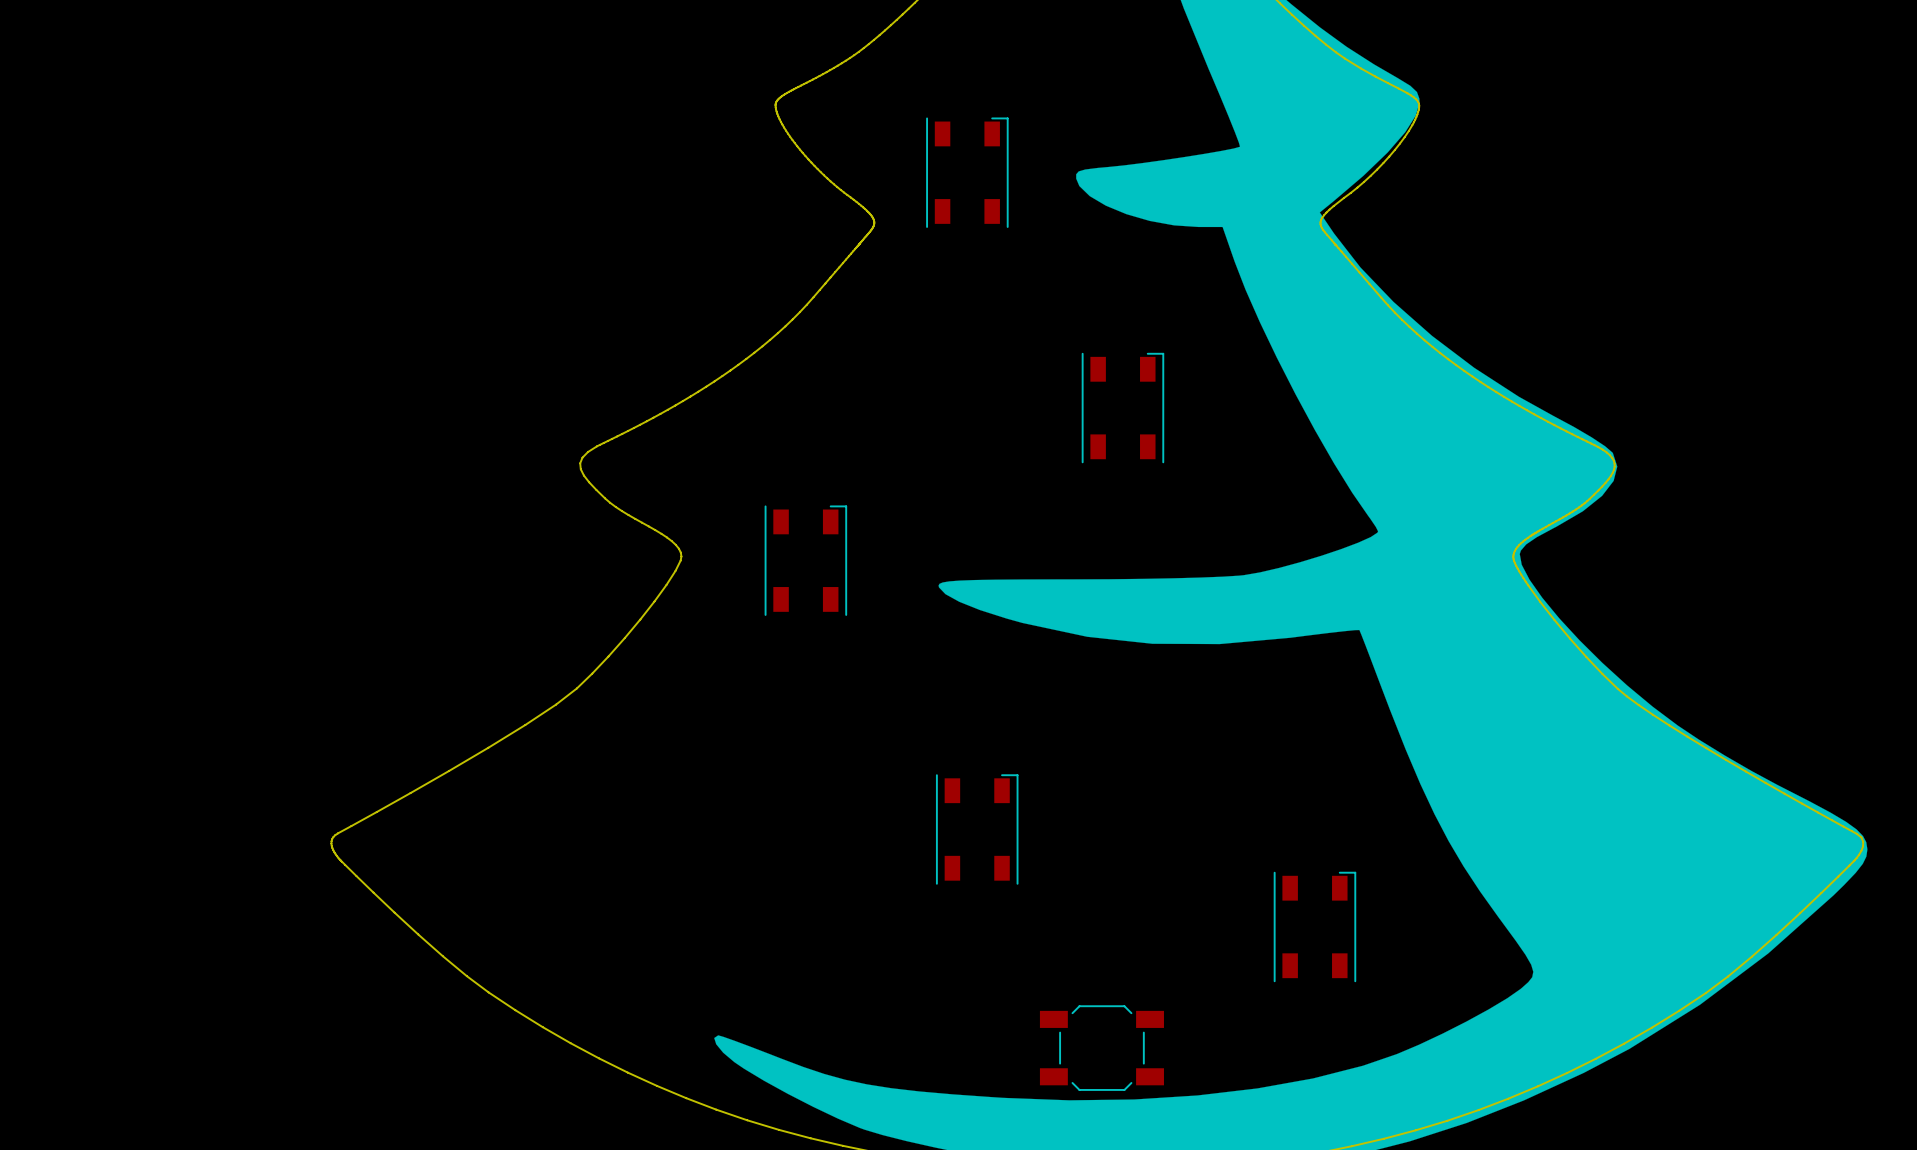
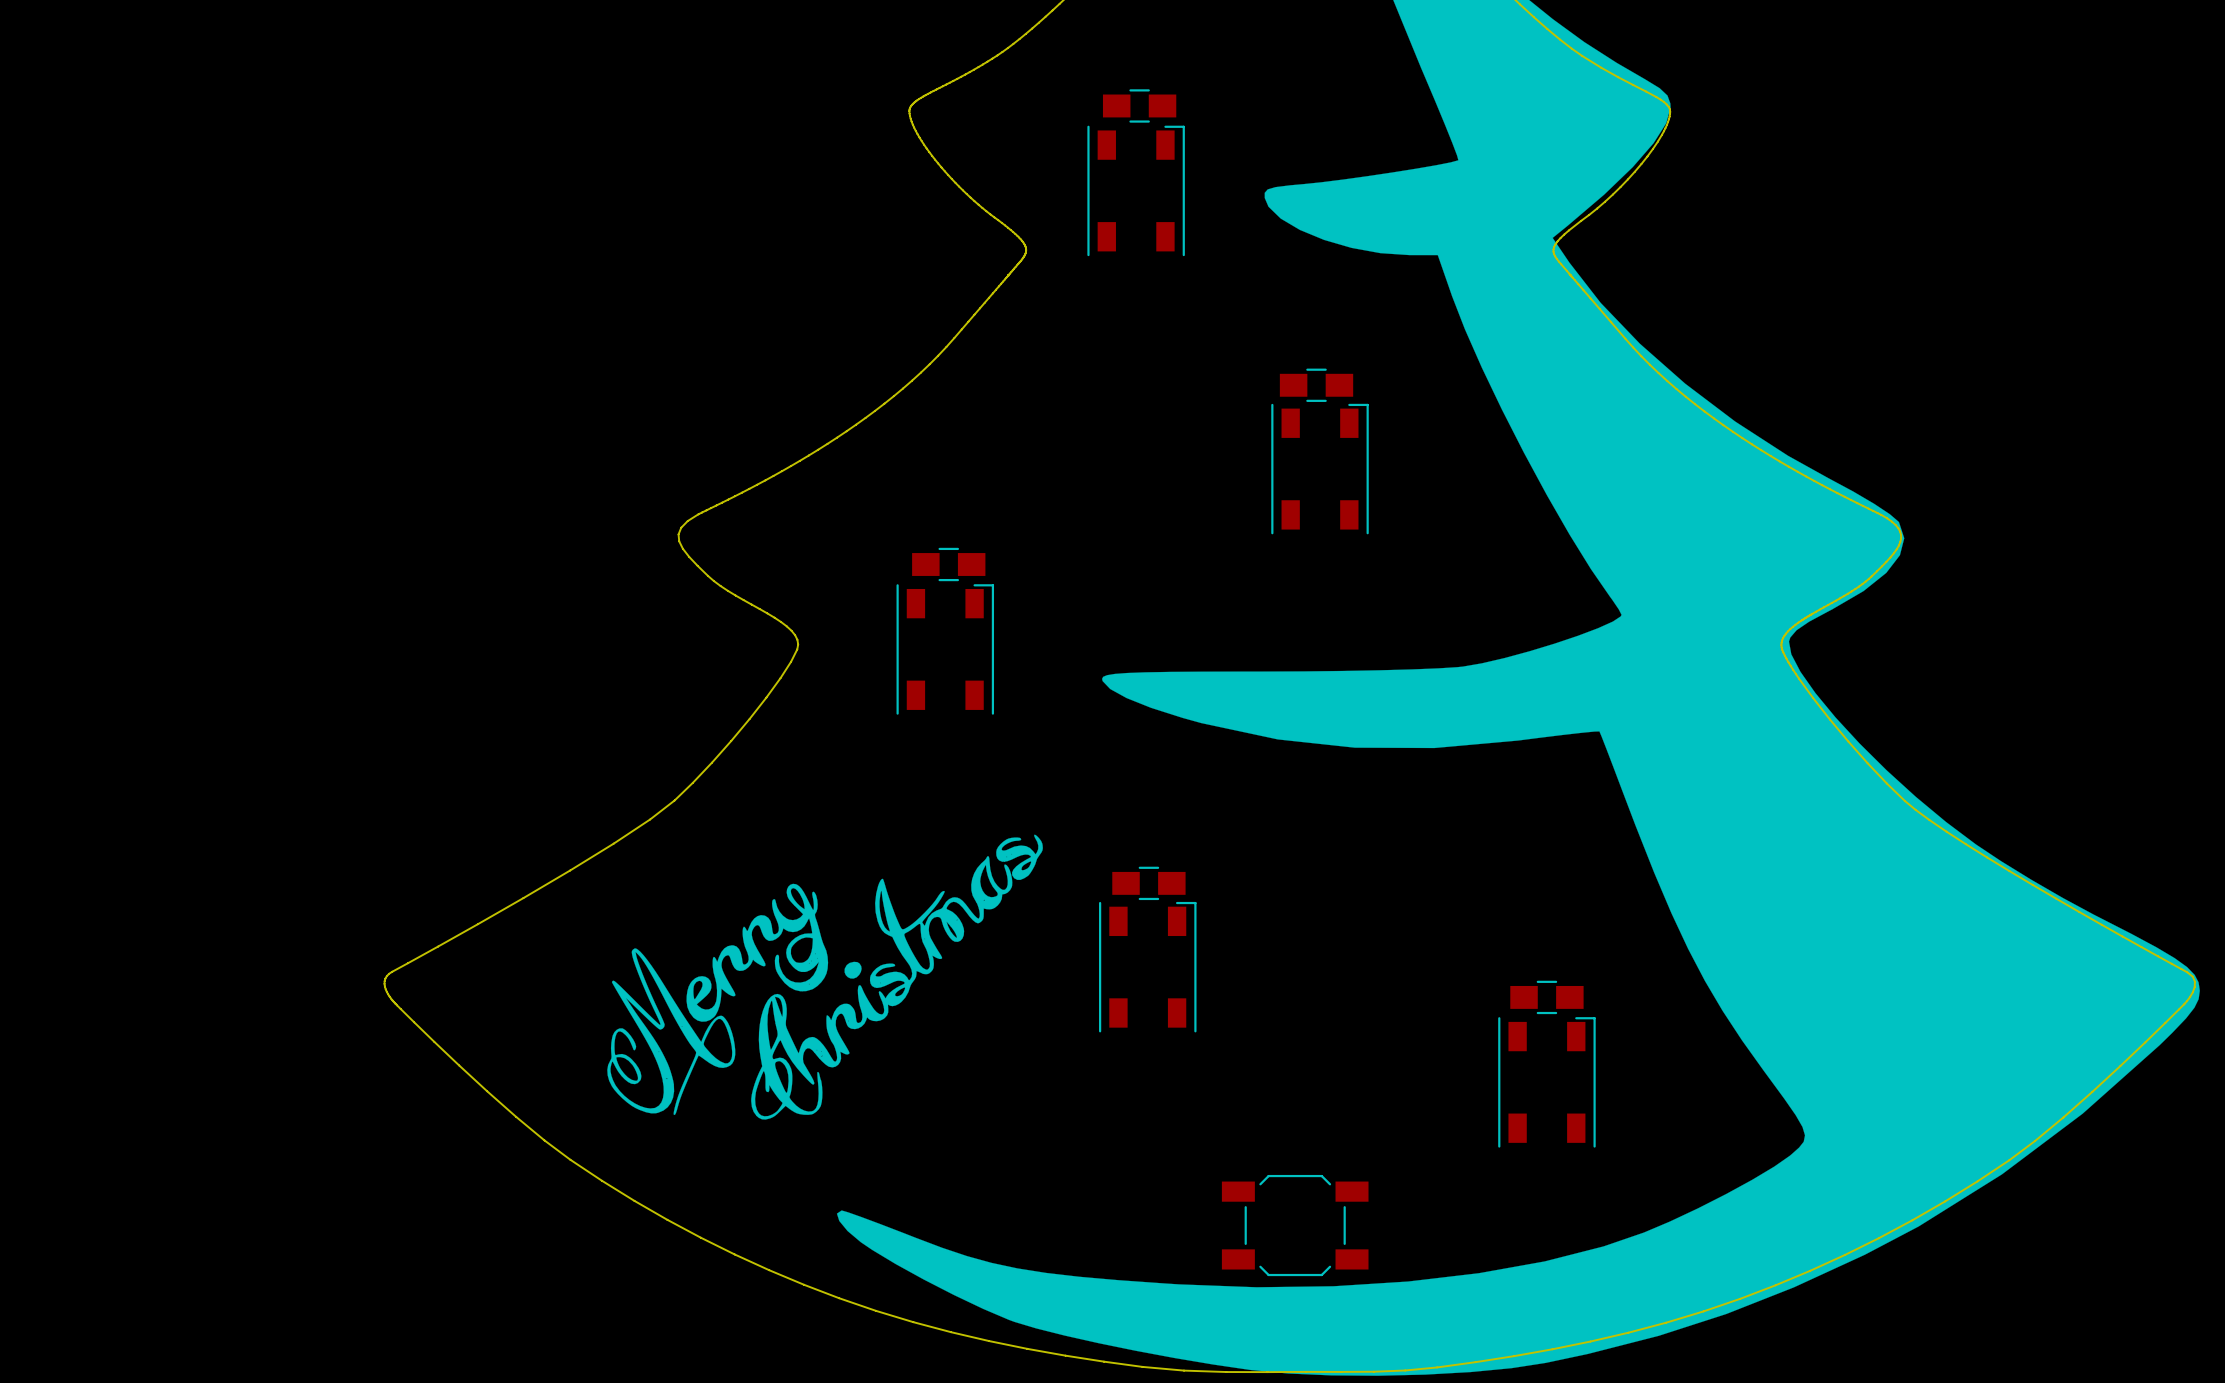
part: none -> (1139, 105)
part: none -> (1316, 385)
part: none -> (948, 564)
drawing: none -> [607, 834, 1043, 1120]
part: none -> (1148, 883)
part: none -> (1546, 997)

